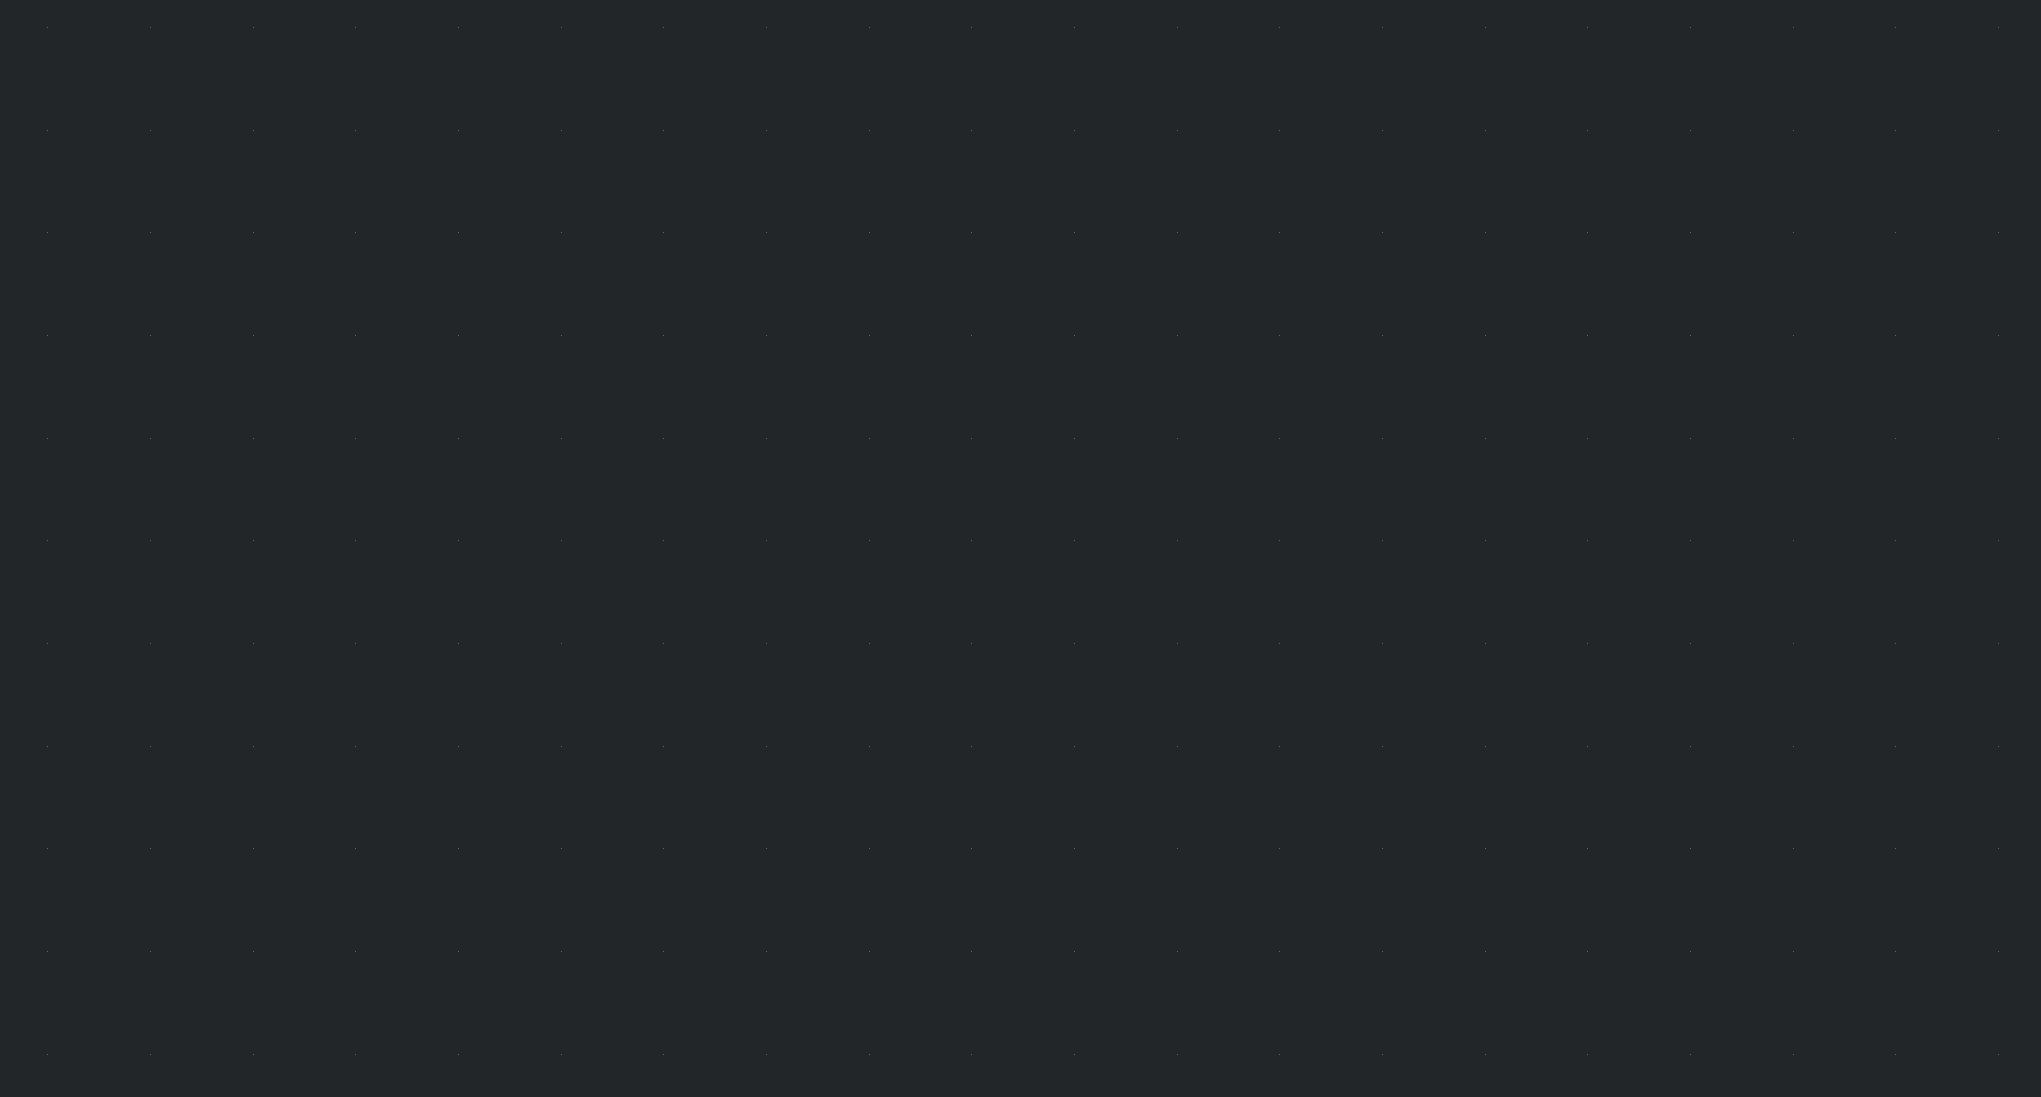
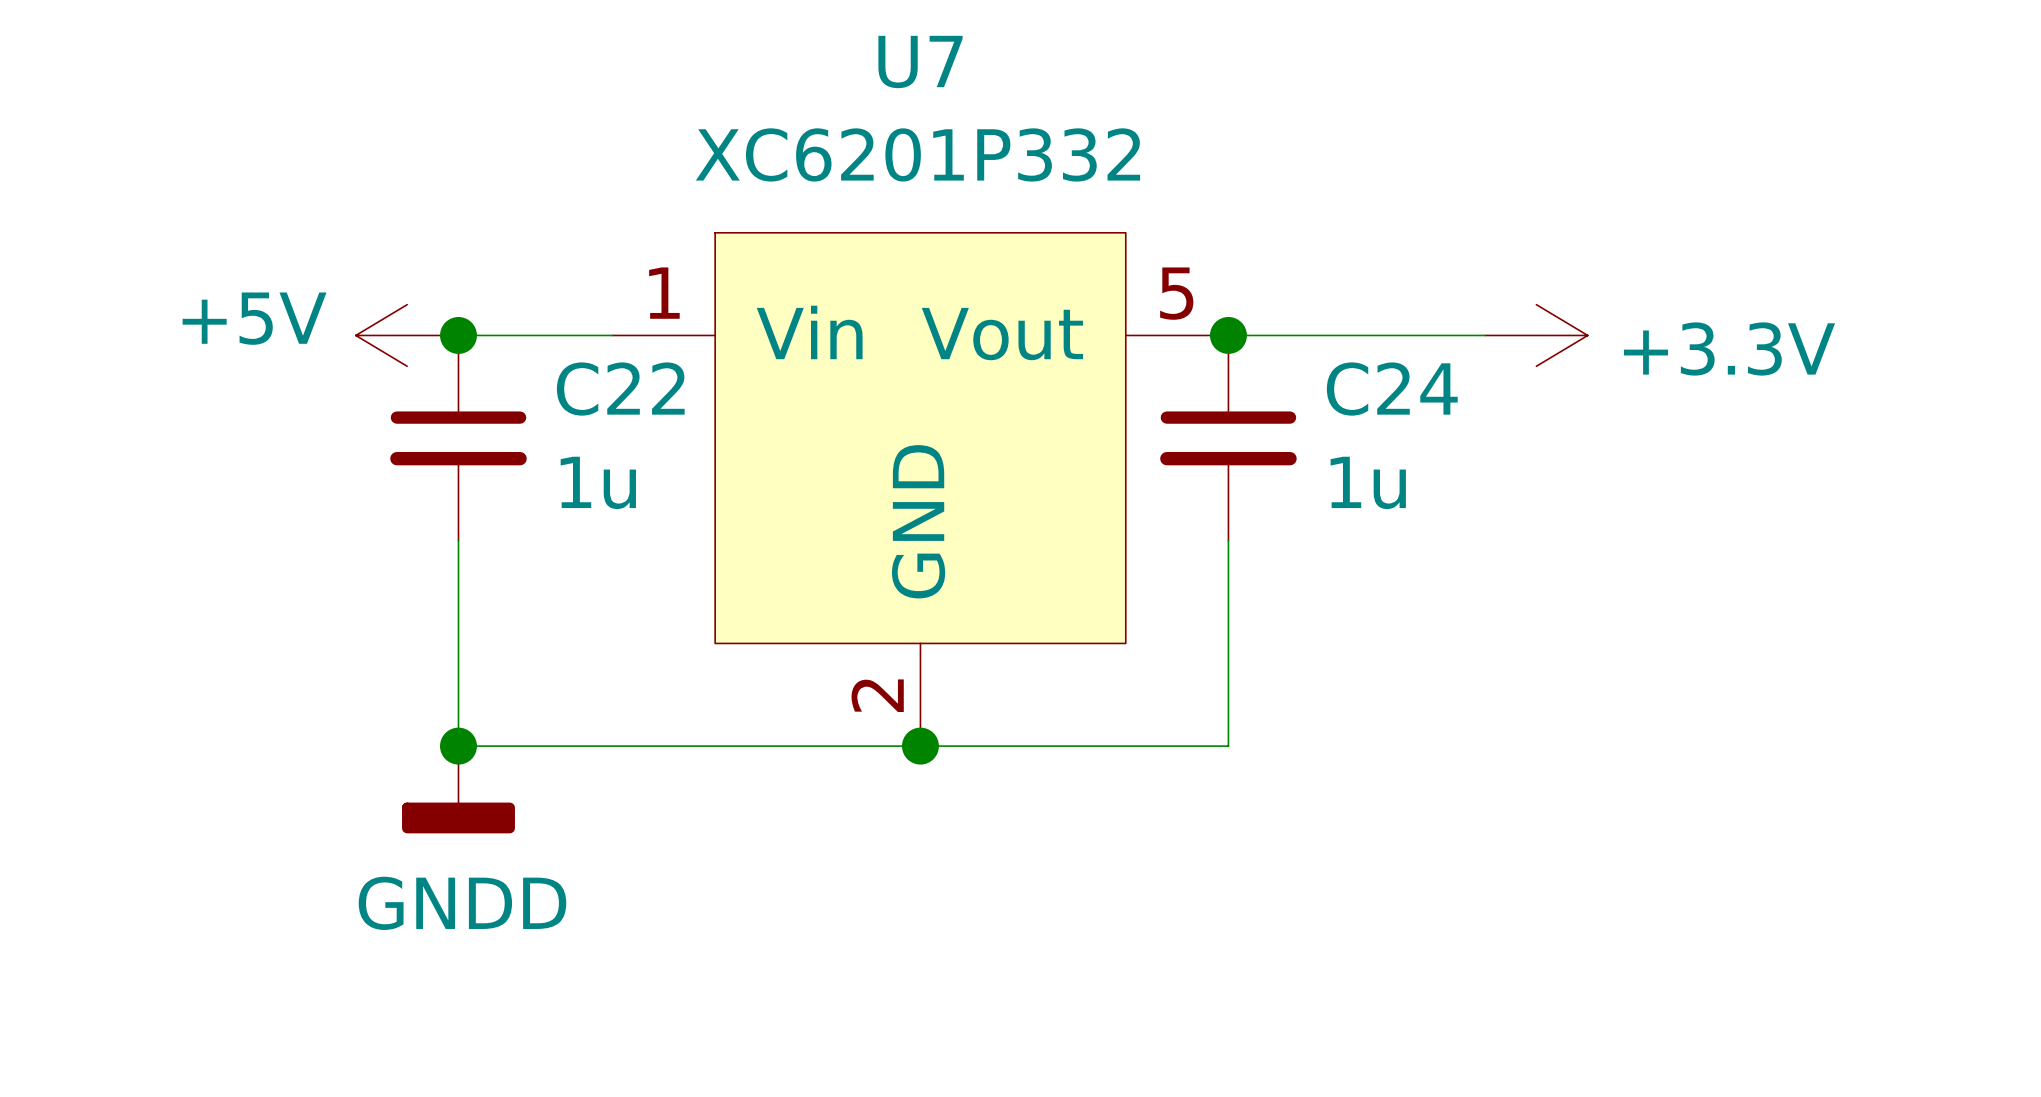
power symbol: none -> +5V (407, 335)
wire: none -> (458, 335) (612, 335)
junction: none -> (458, 335)
wire: none -> (1228, 335) (1485, 335)
junction: none -> (1228, 335)
power symbol: none -> +3.3V (1536, 335)
C22: none -> 1u (458, 438)
C24: none -> 1u (1228, 438)
U7: none -> XC6201P332 (920, 489)
wire: none -> (458, 540) (458, 746) (1228, 746) (1228, 540)
junction: none -> (458, 746)
junction: none -> (920, 746)
power symbol: none -> GNDD (458, 789)

